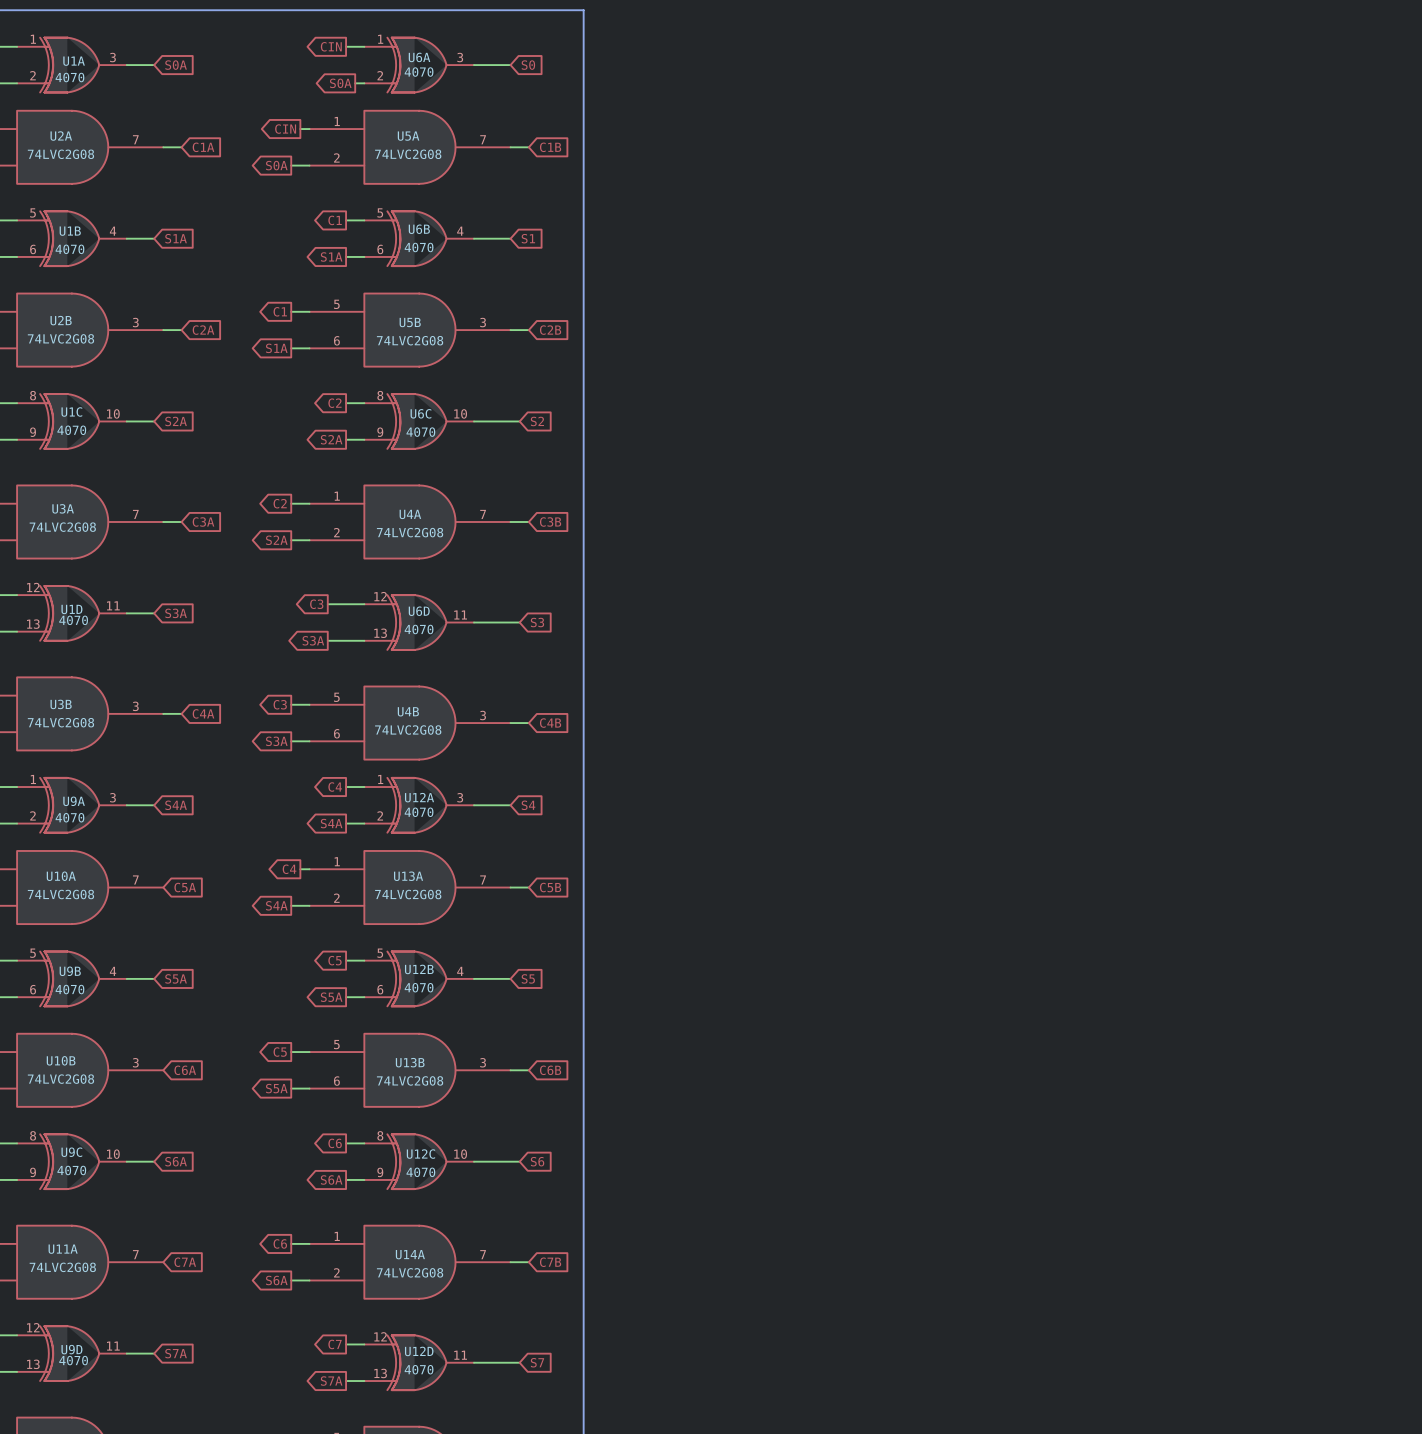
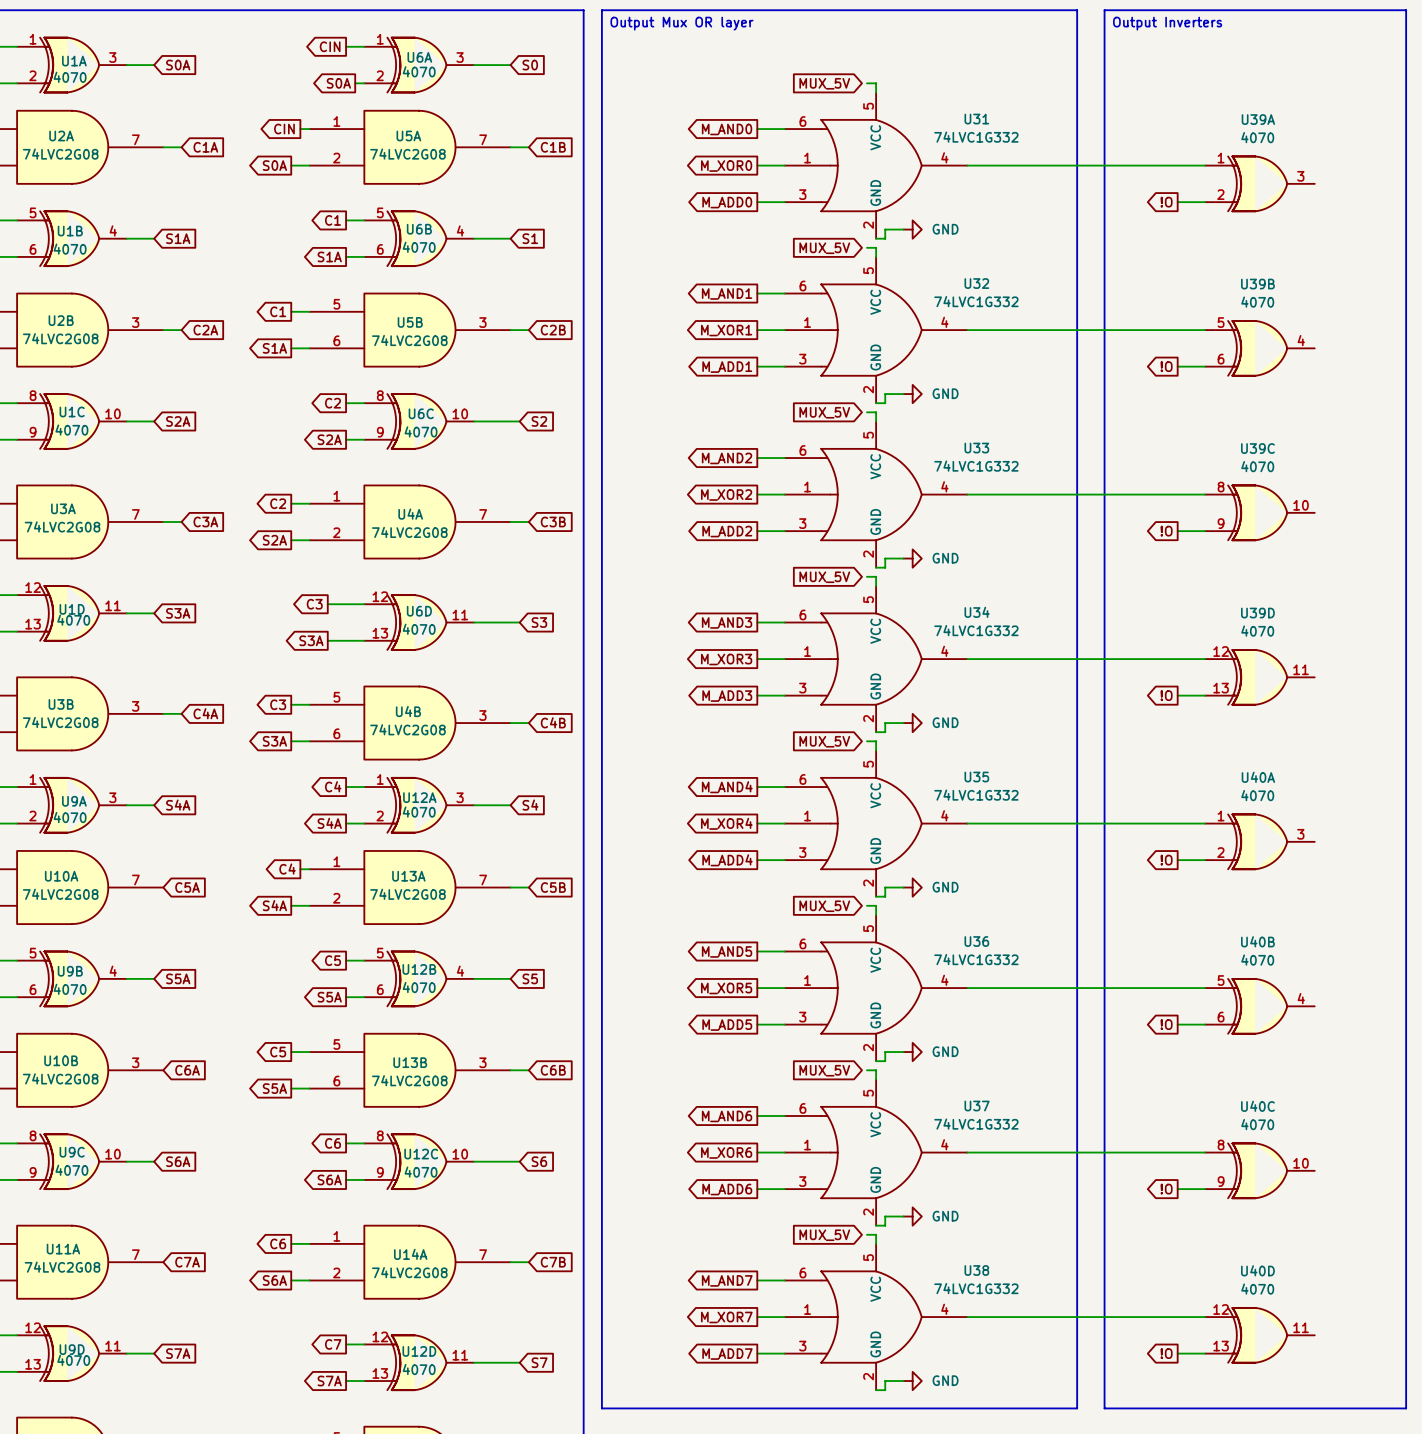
line: none -> (601, 10) (1077, 10) (1077, 1408) (601, 1408) (601, 10)
line: none -> (1104, 10) (1406, 10) (1406, 1408) (1104, 1408) (1104, 10)
text: none -> Output Mux OR layer (681, 23)
text: none -> Output Inverters (1167, 23)
wire: none -> (866, 83) (876, 83) (876, 92)
global label: none -> MUX_5V (824, 83)
wire: none -> (757, 129) (784, 129)
global label: none -> M_AND0 (727, 129)
wire: none -> (757, 165) (784, 165)
U31: none -> 74LVC1G332 (876, 165)
wire: none -> (967, 165) (1205, 165)
global label: none -> M_XOR0 (726, 166)
U39A: none -> 4070 (1259, 183)
wire: none -> (757, 202) (784, 202)
global label: none -> !O (1166, 202)
wire: none -> (1177, 202) (1205, 202)
global label: none -> M_ADD0 (727, 202)
wire: none -> (903, 229) (885, 229) (885, 238) (876, 238)
power symbol: none -> GND (912, 229)
wire: none -> (866, 247) (876, 247) (876, 256)
global label: none -> MUX_5V (824, 248)
wire: none -> (757, 293) (784, 293)
global label: none -> M_AND1 (727, 293)
wire: none -> (757, 330) (784, 330)
U32: none -> 74LVC1G332 (876, 330)
wire: none -> (967, 330) (1205, 330)
global label: none -> M_XOR1 (726, 330)
U39B: none -> 4070 (1259, 348)
wire: none -> (757, 366) (784, 366)
global label: none -> !O (1166, 366)
wire: none -> (1177, 366) (1205, 366)
global label: none -> M_ADD1 (727, 367)
wire: none -> (903, 394) (885, 394) (885, 403) (876, 403)
power symbol: none -> GND (912, 394)
wire: none -> (866, 412) (876, 412) (876, 421)
global label: none -> MUX_5V (824, 412)
wire: none -> (757, 458) (784, 458)
global label: none -> M_AND2 (727, 458)
wire: none -> (757, 494) (784, 494)
U33: none -> 74LVC1G332 (876, 494)
wire: none -> (967, 494) (1205, 494)
global label: none -> M_XOR2 (726, 495)
U39C: none -> 4070 (1259, 512)
wire: none -> (757, 531) (784, 531)
global label: none -> !O (1166, 531)
wire: none -> (1177, 531) (1205, 531)
global label: none -> M_ADD2 (727, 531)
wire: none -> (903, 558) (885, 558) (885, 567) (876, 567)
power symbol: none -> GND (912, 558)
wire: none -> (866, 576) (876, 576) (876, 585)
global label: none -> MUX_5V (824, 577)
wire: none -> (757, 622) (784, 622)
global label: none -> M_AND3 (727, 622)
wire: none -> (757, 659) (784, 659)
U34: none -> 74LVC1G332 (876, 659)
wire: none -> (967, 659) (1205, 659)
global label: none -> M_XOR3 (726, 659)
U39D: none -> 4070 (1259, 677)
wire: none -> (757, 695) (784, 695)
global label: none -> !O (1166, 695)
wire: none -> (1177, 695) (1205, 695)
global label: none -> M_ADD3 (727, 696)
wire: none -> (903, 723) (885, 723) (885, 732) (876, 732)
power symbol: none -> GND (912, 723)
wire: none -> (866, 741) (876, 741) (876, 750)
global label: none -> MUX_5V (824, 741)
wire: none -> (757, 787) (784, 787)
global label: none -> M_AND4 (727, 787)
wire: none -> (757, 823) (784, 823)
U35: none -> 74LVC1G332 (876, 823)
wire: none -> (967, 823) (1205, 823)
global label: none -> M_XOR4 (726, 823)
U40A: none -> 4070 (1259, 841)
wire: none -> (757, 860) (784, 860)
global label: none -> !O (1166, 860)
wire: none -> (1177, 860) (1205, 860)
global label: none -> M_ADD4 (727, 860)
wire: none -> (903, 887) (885, 887) (885, 896) (876, 896)
power symbol: none -> GND (912, 887)
wire: none -> (866, 905) (876, 905) (876, 914)
global label: none -> MUX_5V (824, 906)
wire: none -> (757, 951) (784, 951)
global label: none -> M_AND5 (727, 951)
wire: none -> (757, 988) (784, 988)
U36: none -> 74LVC1G332 (876, 988)
wire: none -> (967, 988) (1205, 988)
global label: none -> M_XOR5 (726, 988)
U40B: none -> 4070 (1259, 1006)
wire: none -> (757, 1024) (784, 1024)
global label: none -> !O (1166, 1024)
wire: none -> (1177, 1024) (1205, 1024)
global label: none -> M_ADD5 (727, 1025)
wire: none -> (903, 1052) (885, 1052) (885, 1061) (876, 1061)
power symbol: none -> GND (912, 1052)
wire: none -> (866, 1070) (876, 1070) (876, 1079)
global label: none -> MUX_5V (824, 1070)
wire: none -> (757, 1115) (784, 1115)
global label: none -> M_AND6 (727, 1116)
wire: none -> (757, 1152) (784, 1152)
U37: none -> 74LVC1G332 (876, 1152)
wire: none -> (967, 1152) (1205, 1152)
global label: none -> M_XOR6 (726, 1152)
U40C: none -> 4070 (1259, 1170)
wire: none -> (757, 1189) (784, 1189)
global label: none -> !O (1166, 1189)
wire: none -> (1177, 1189) (1205, 1189)
global label: none -> M_ADD6 (727, 1189)
wire: none -> (903, 1216) (885, 1216) (885, 1225) (876, 1225)
power symbol: none -> GND (912, 1216)
wire: none -> (866, 1234) (876, 1234) (876, 1243)
global label: none -> MUX_5V (824, 1235)
wire: none -> (757, 1280) (784, 1280)
global label: none -> M_AND7 (727, 1280)
wire: none -> (757, 1317) (784, 1317)
U38: none -> 74LVC1G332 (876, 1317)
wire: none -> (967, 1317) (1205, 1317)
global label: none -> M_XOR7 (726, 1317)
U40D: none -> 4070 (1259, 1335)
wire: none -> (757, 1353) (784, 1353)
global label: none -> !O (1166, 1353)
wire: none -> (1177, 1353) (1205, 1353)
global label: none -> M_ADD7 (727, 1354)
wire: none -> (903, 1381) (885, 1381) (885, 1390) (876, 1390)
power symbol: none -> GND (912, 1381)

